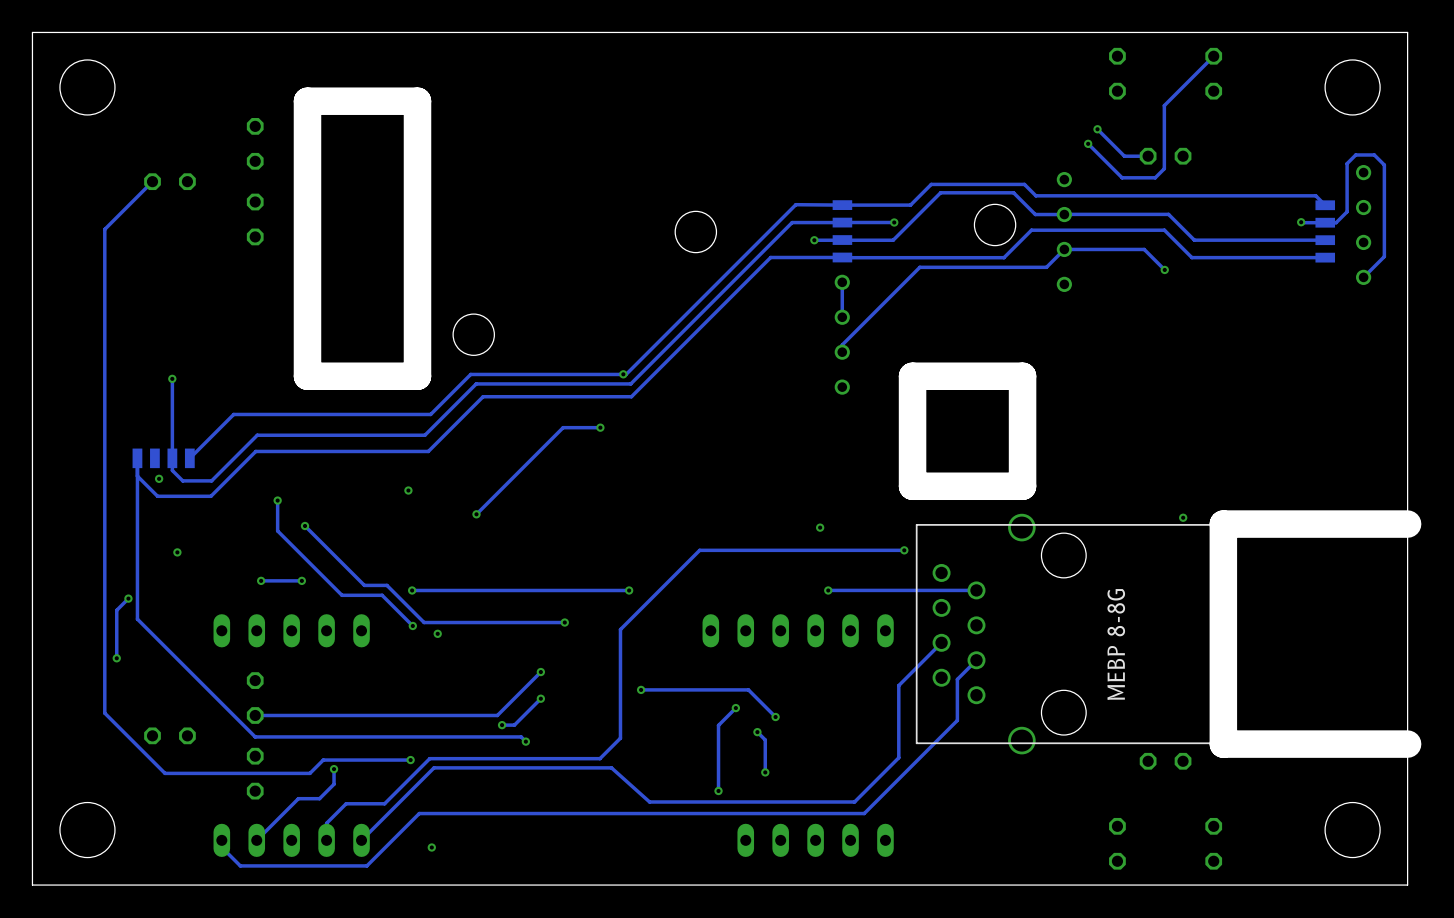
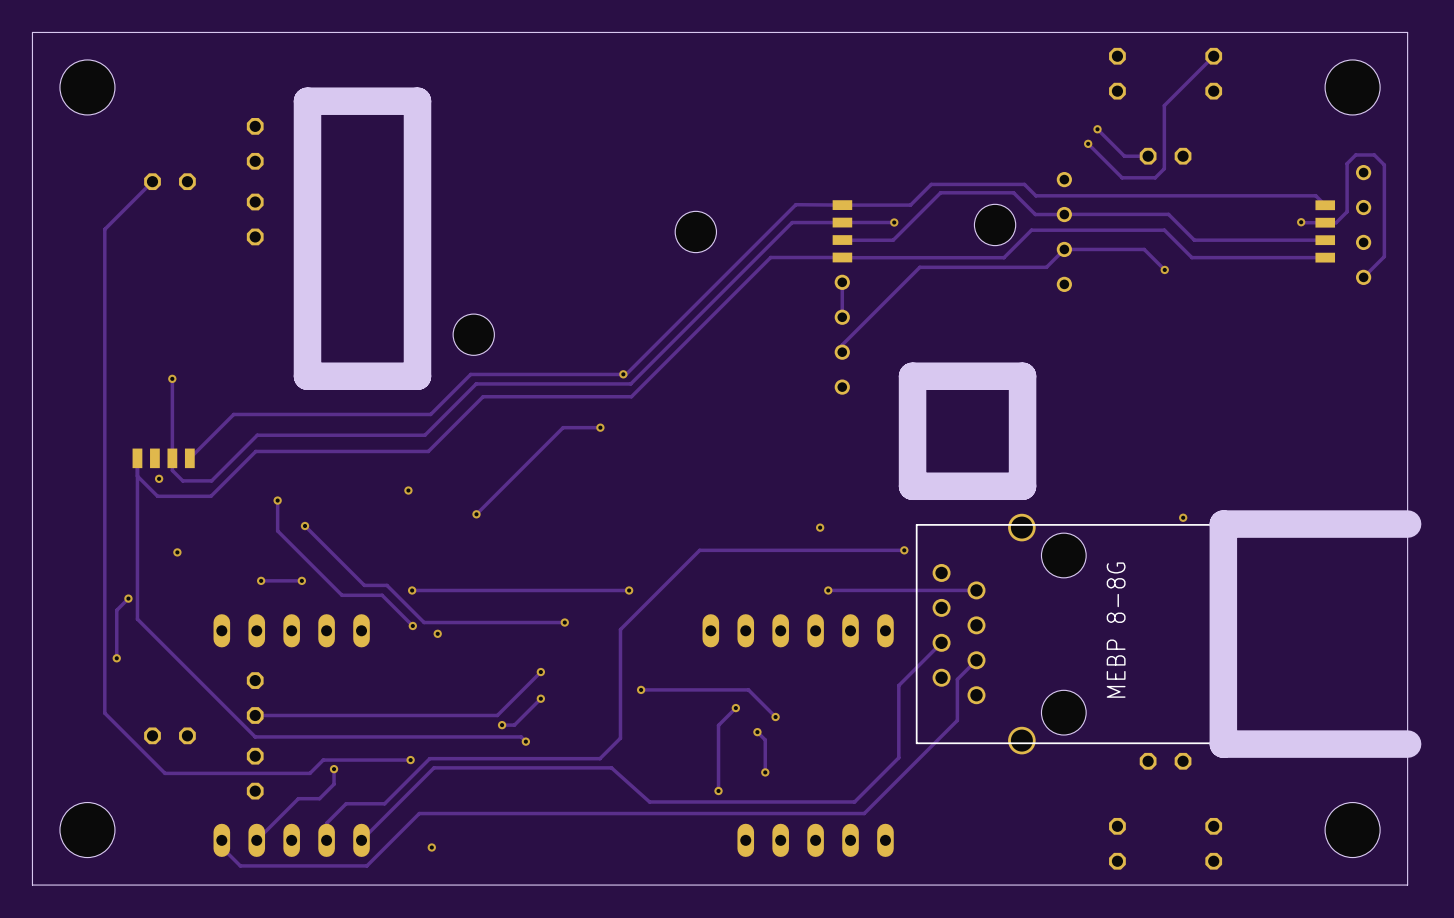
via: (814, 240) -> none
track: (842, 240) (814, 240) -> none

